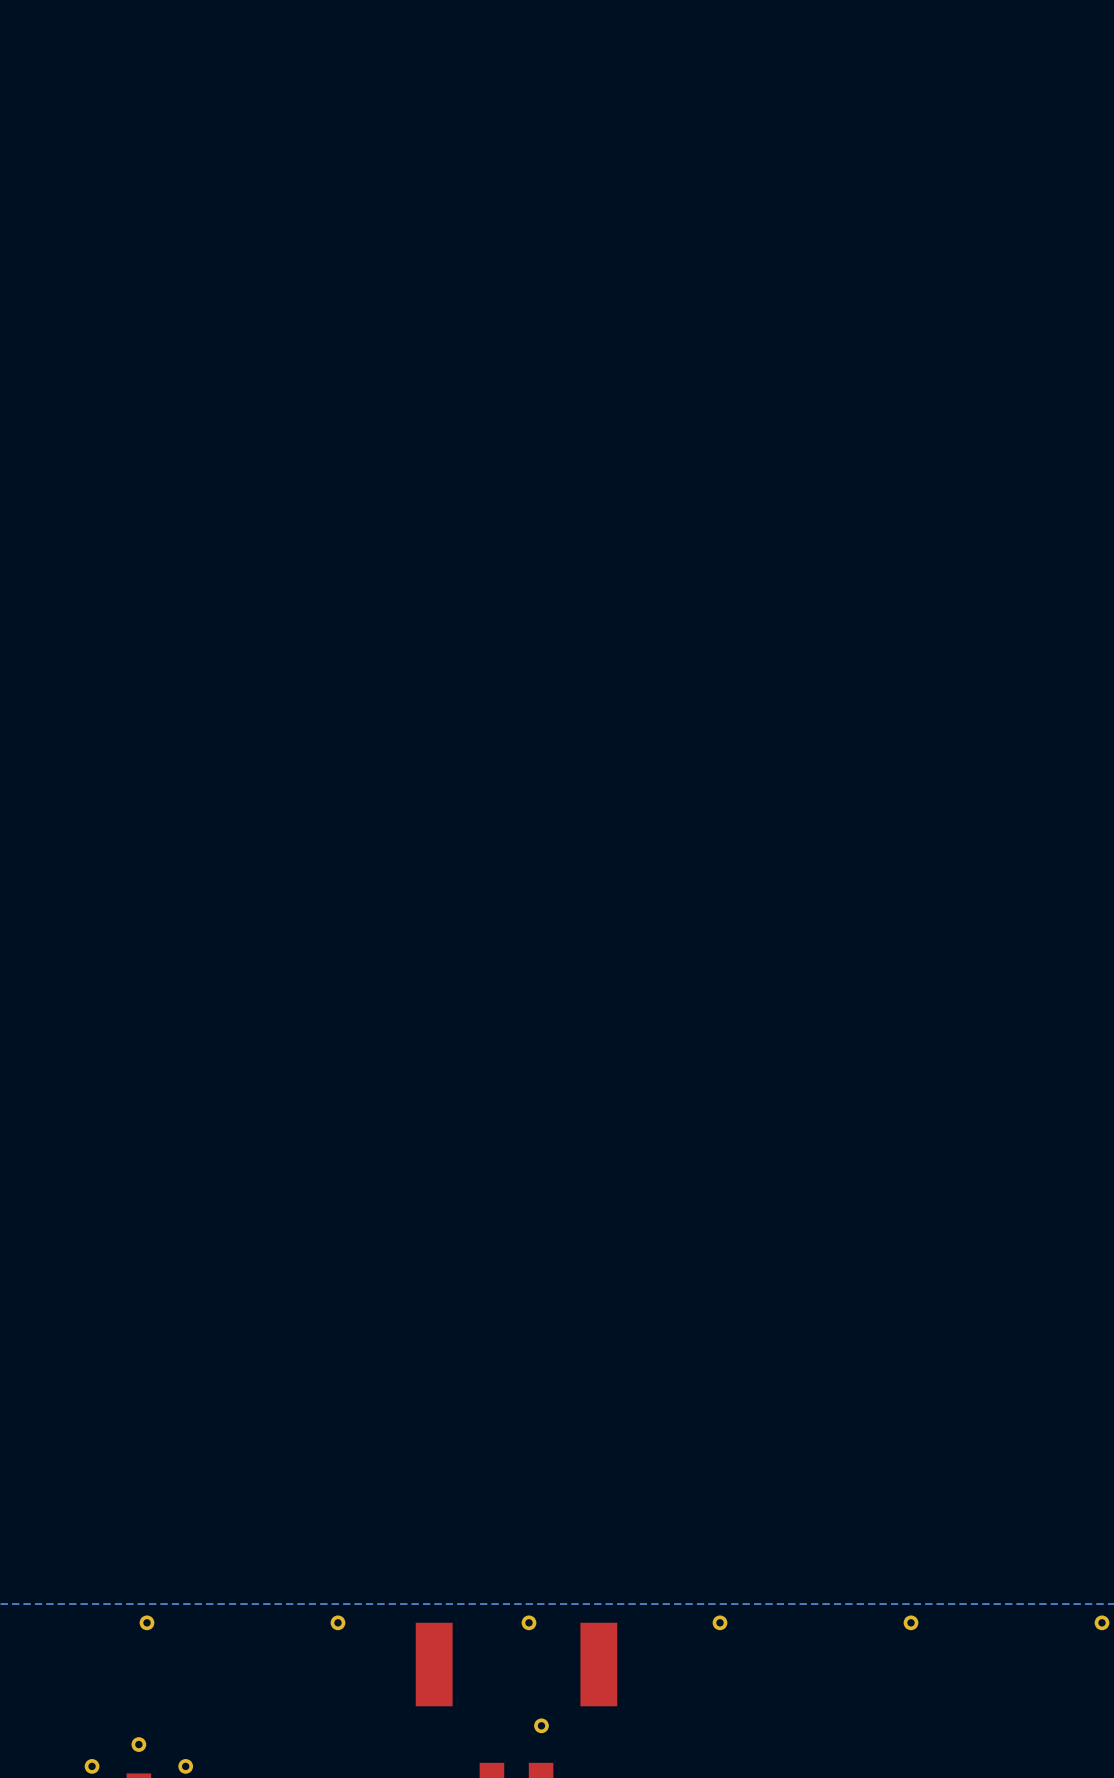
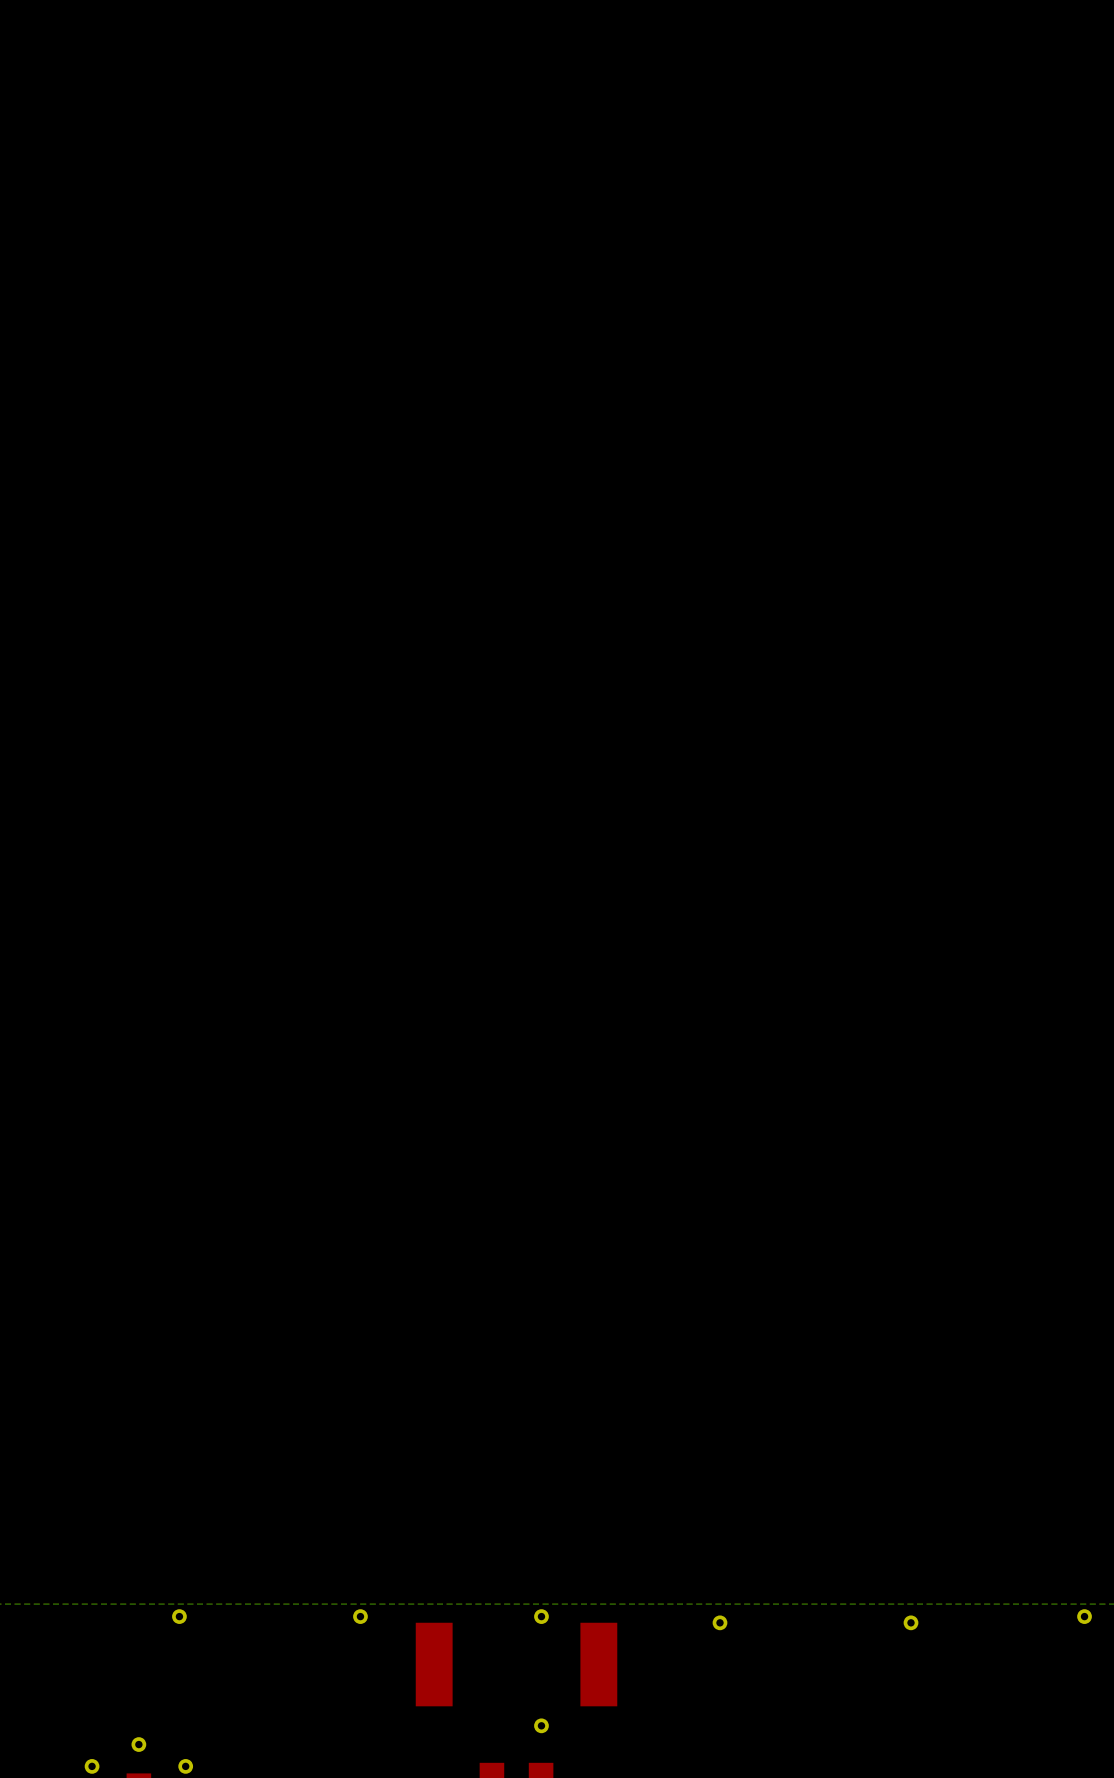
part position: (146, 1622) -> (179, 1616)
part position: (337, 1622) -> (360, 1616)
part position: (528, 1622) -> (541, 1616)
part position: (1102, 1622) -> (1084, 1616)

